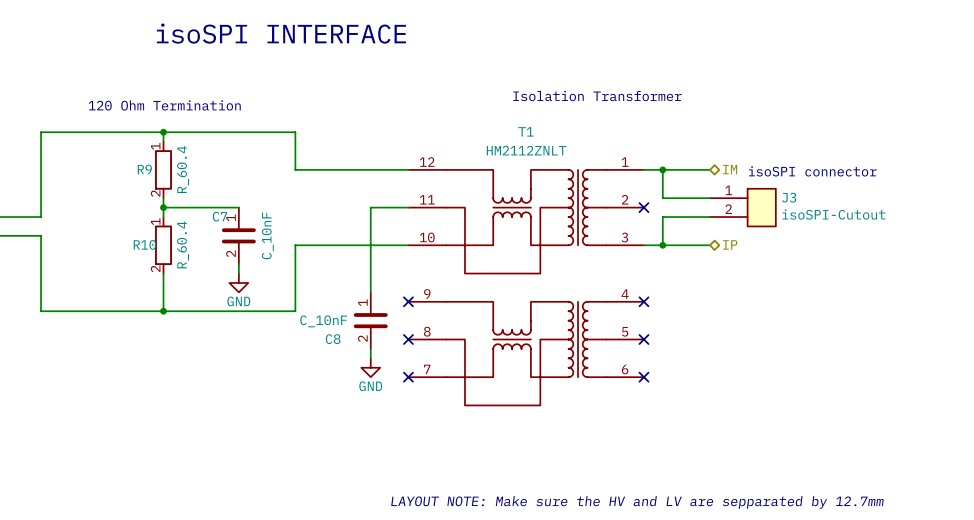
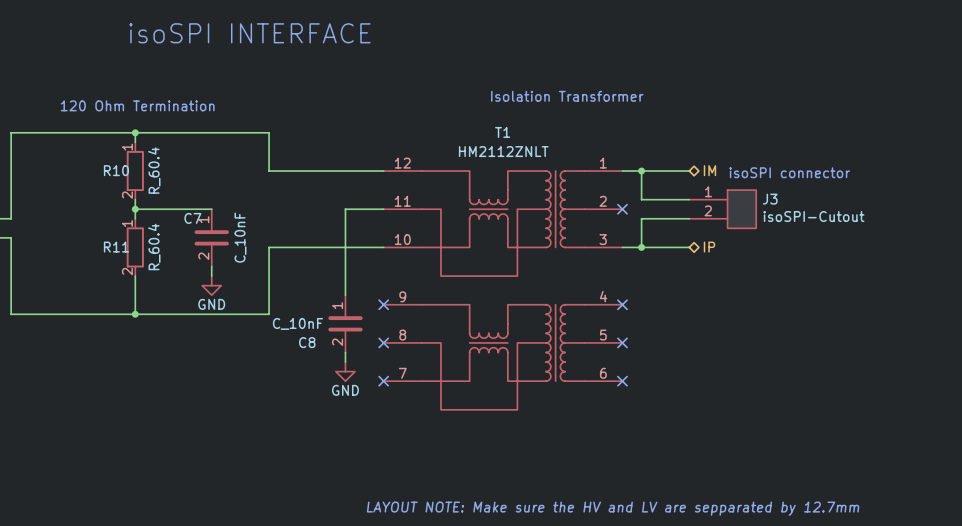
R9 name: R9 (144, 169) -> R10 (116, 170)
R10 name: R10 (144, 244) -> R11 (116, 247)

